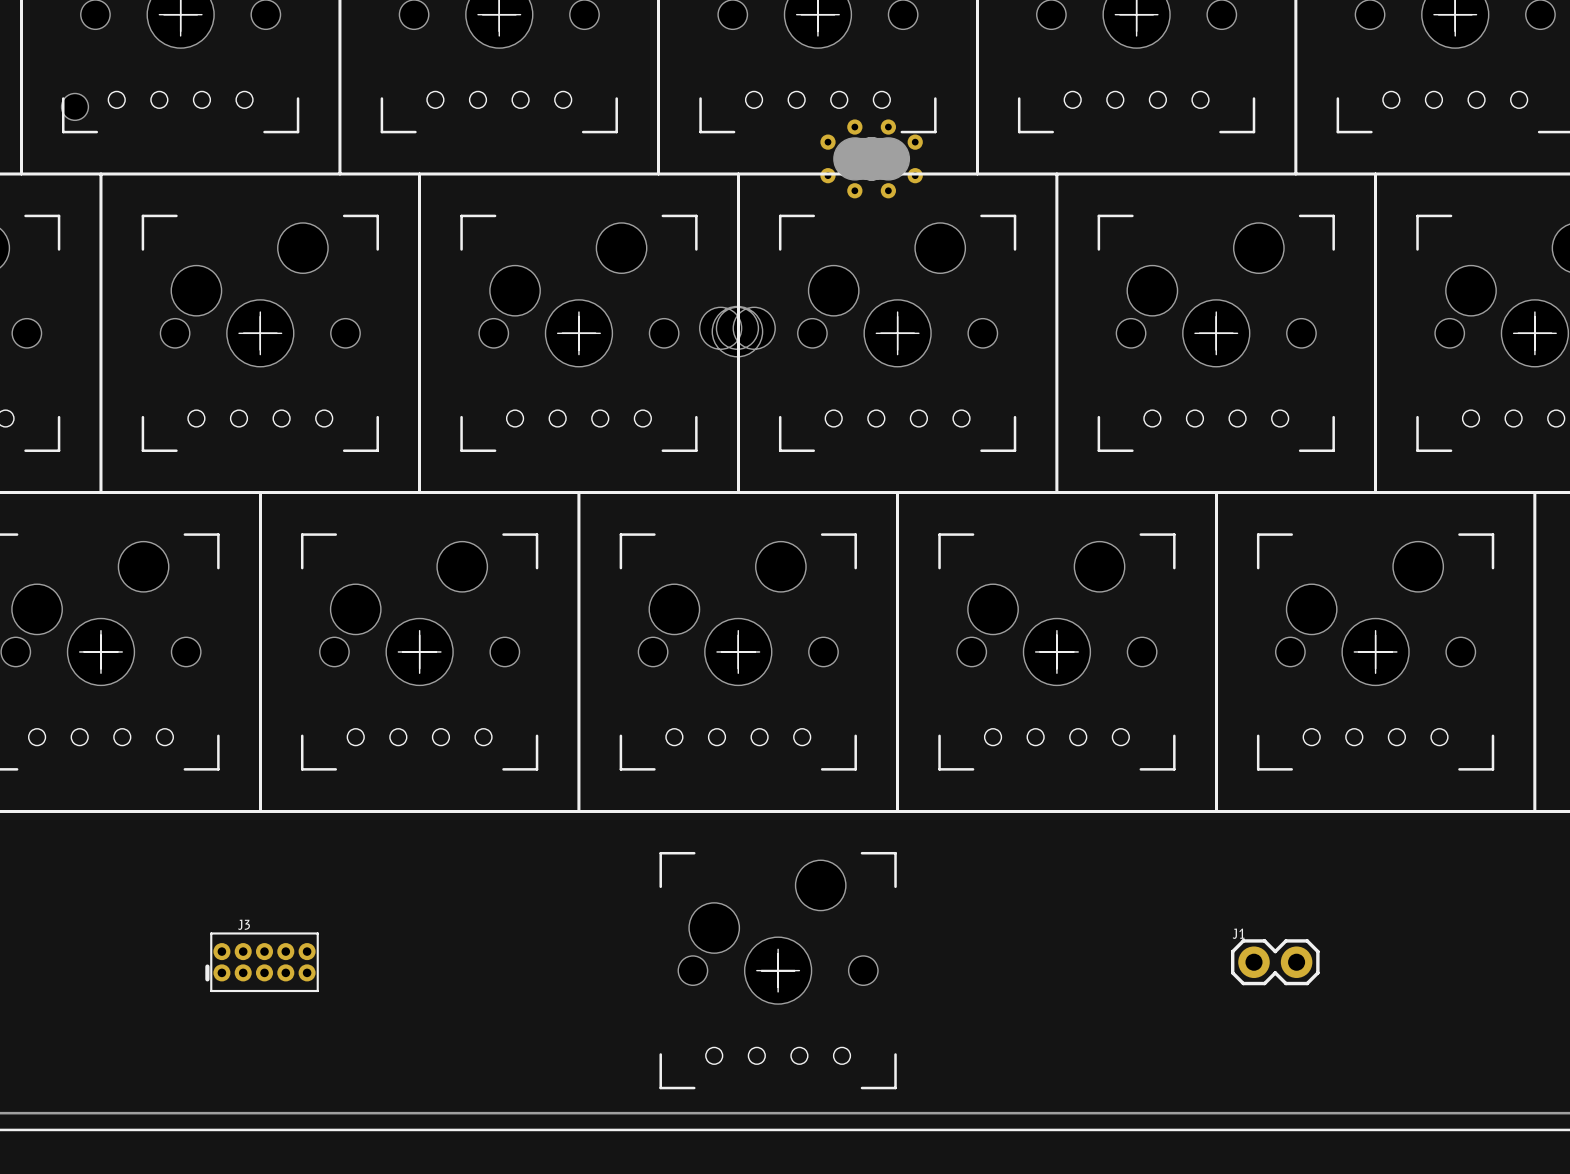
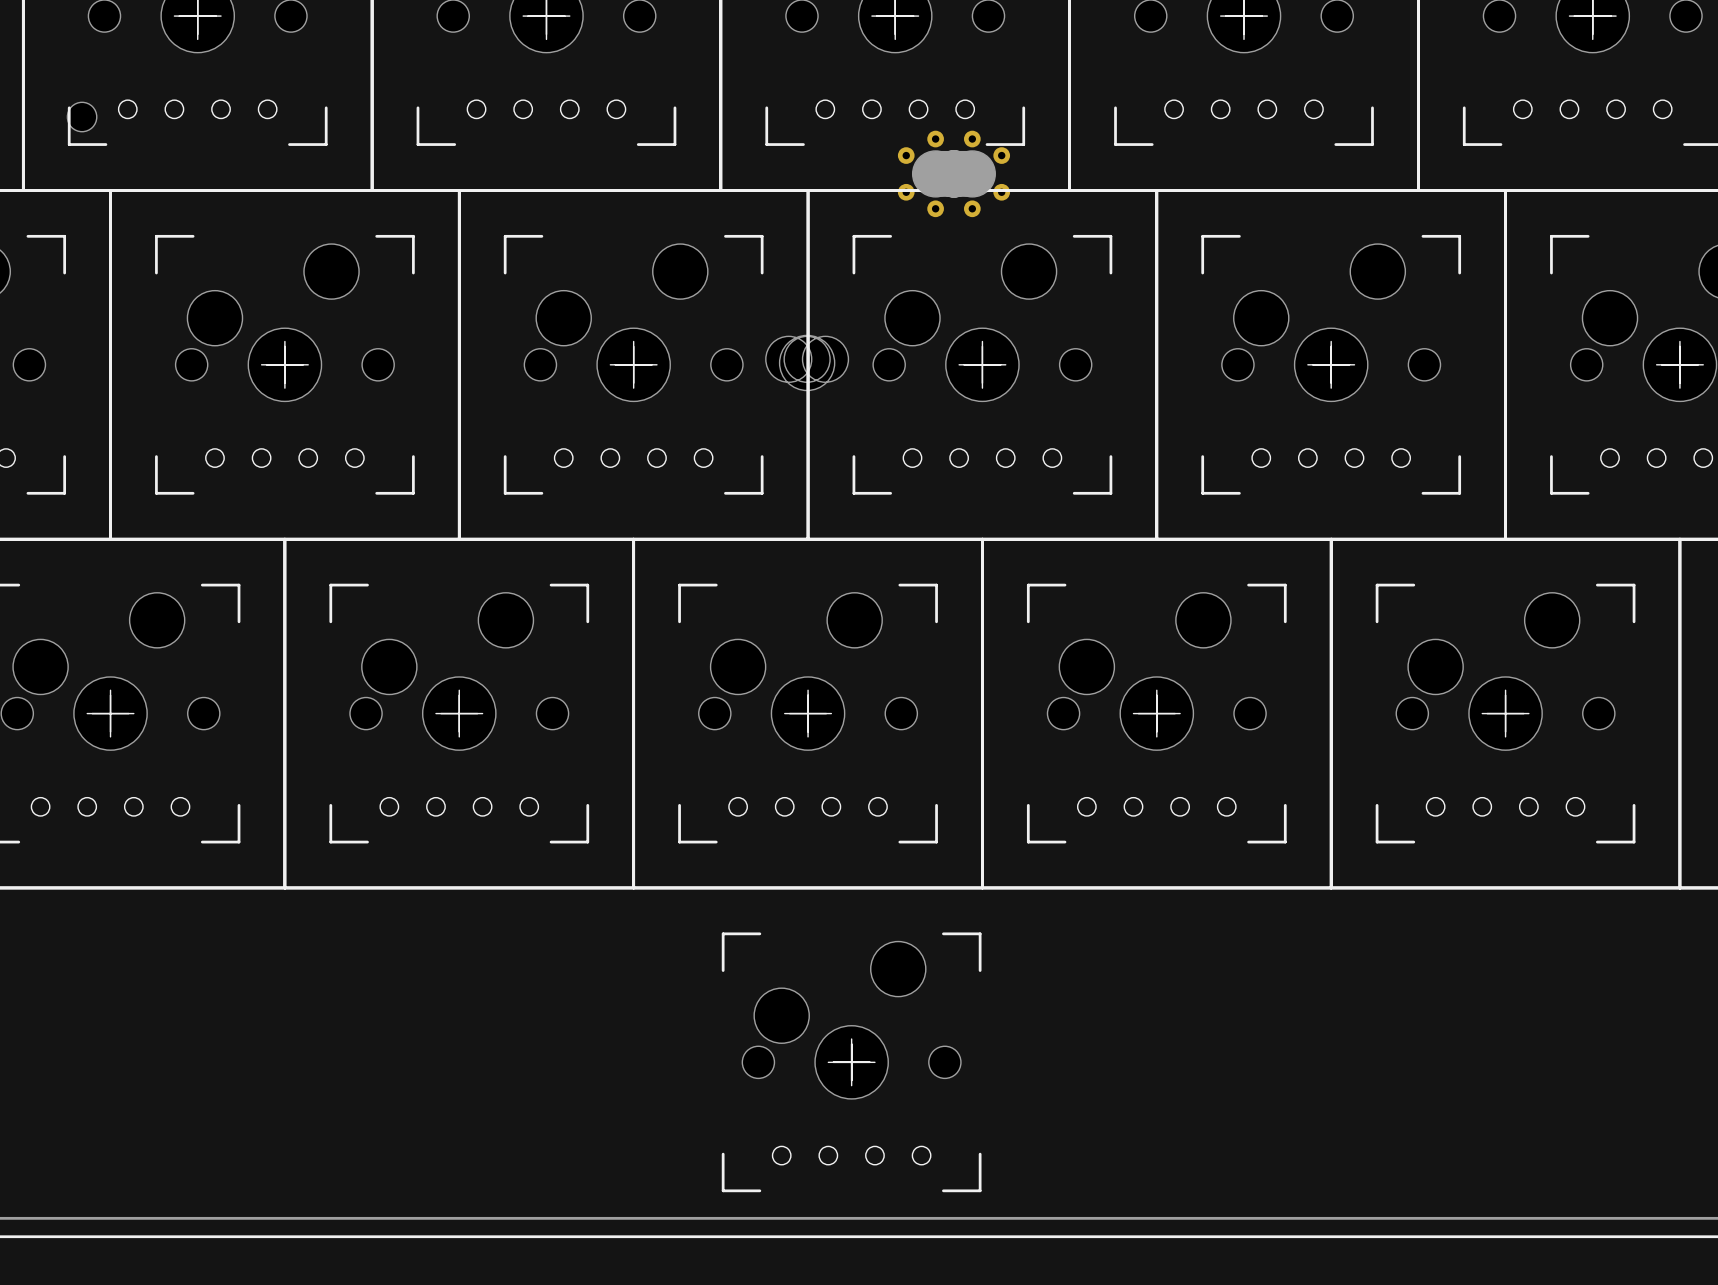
J3: (262, 962) -> none
J1: (1275, 962) -> none

